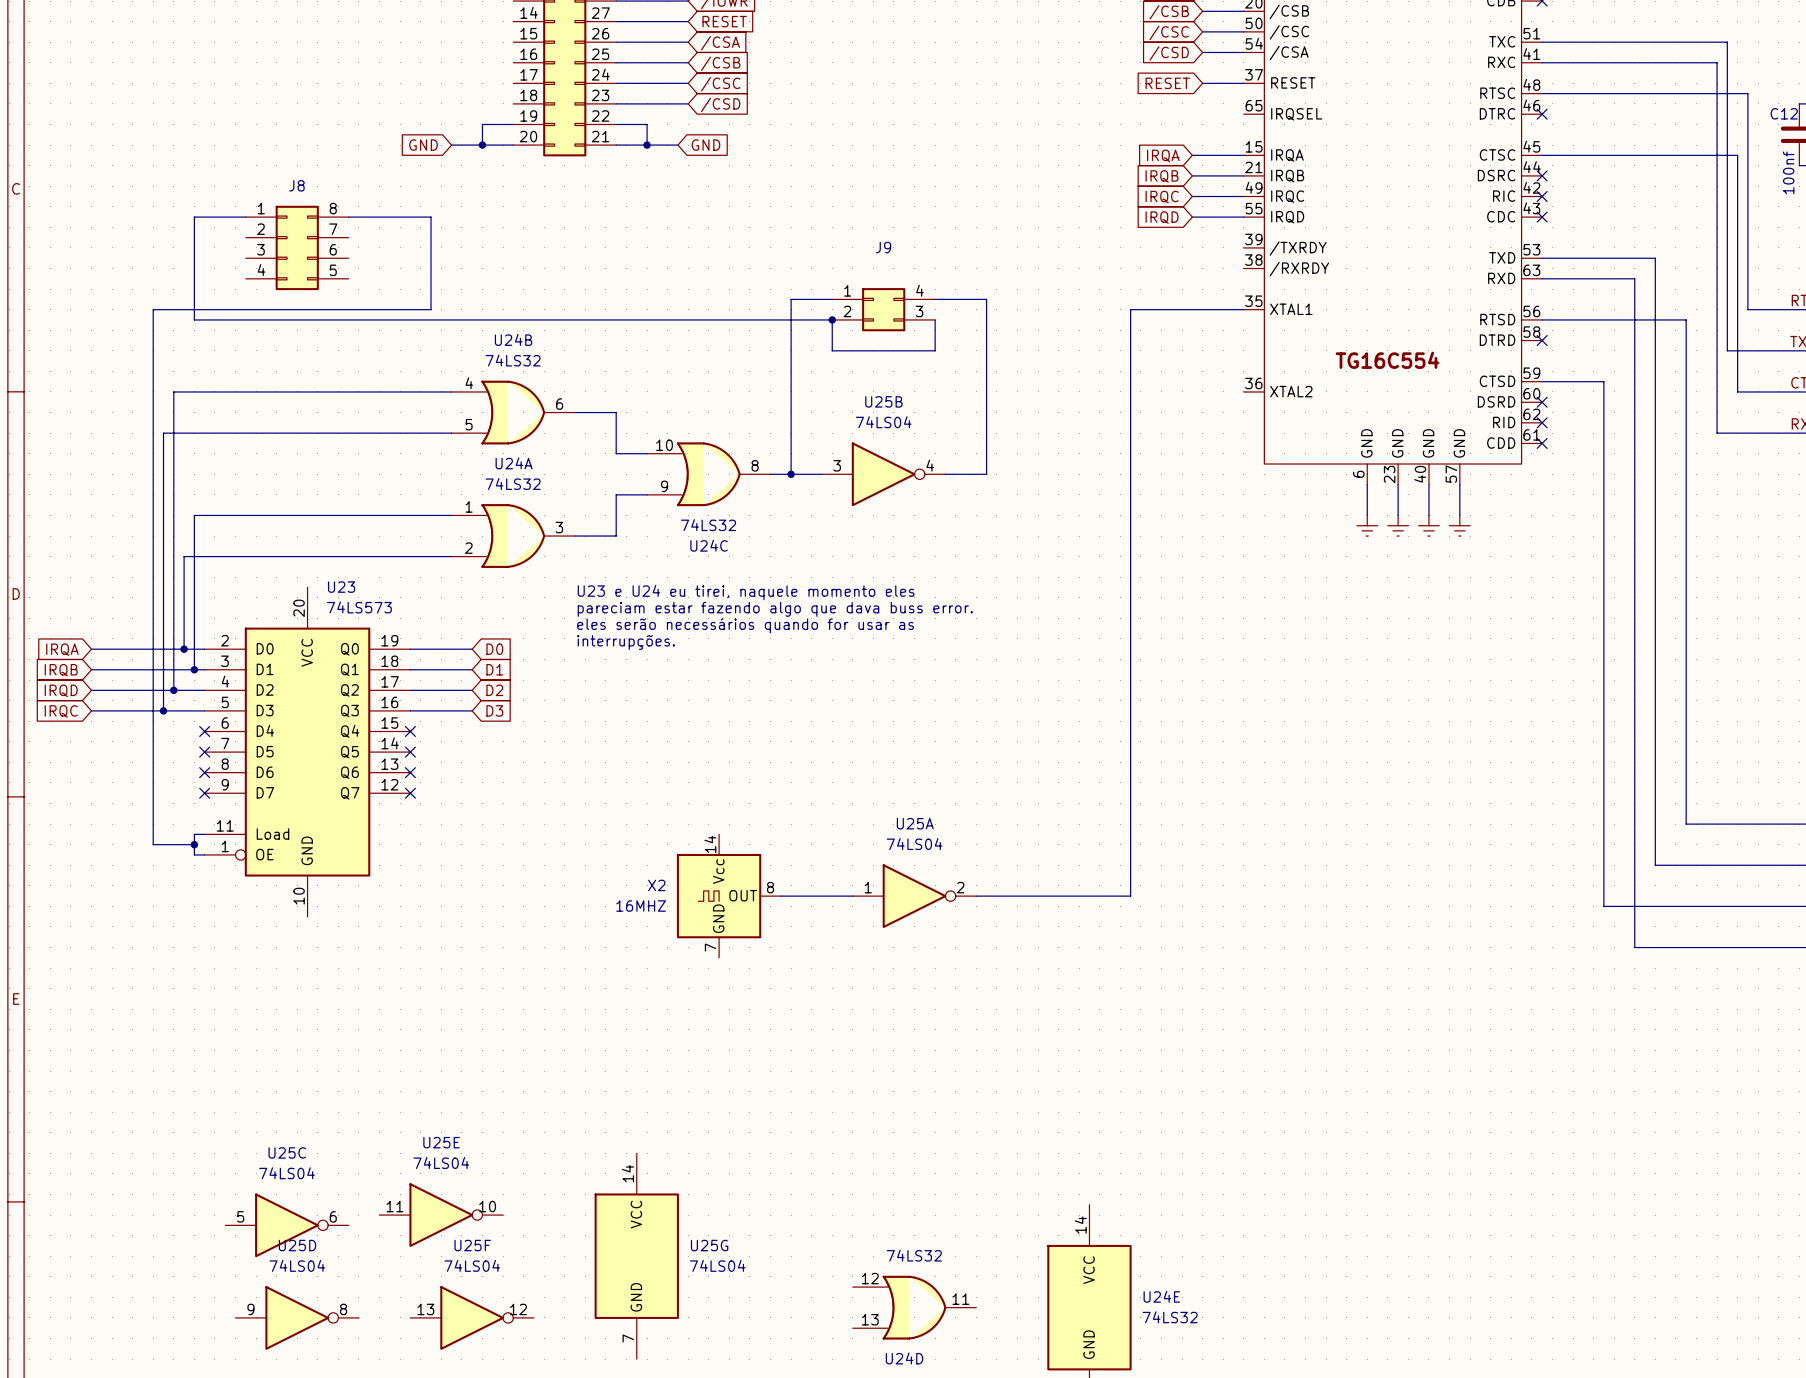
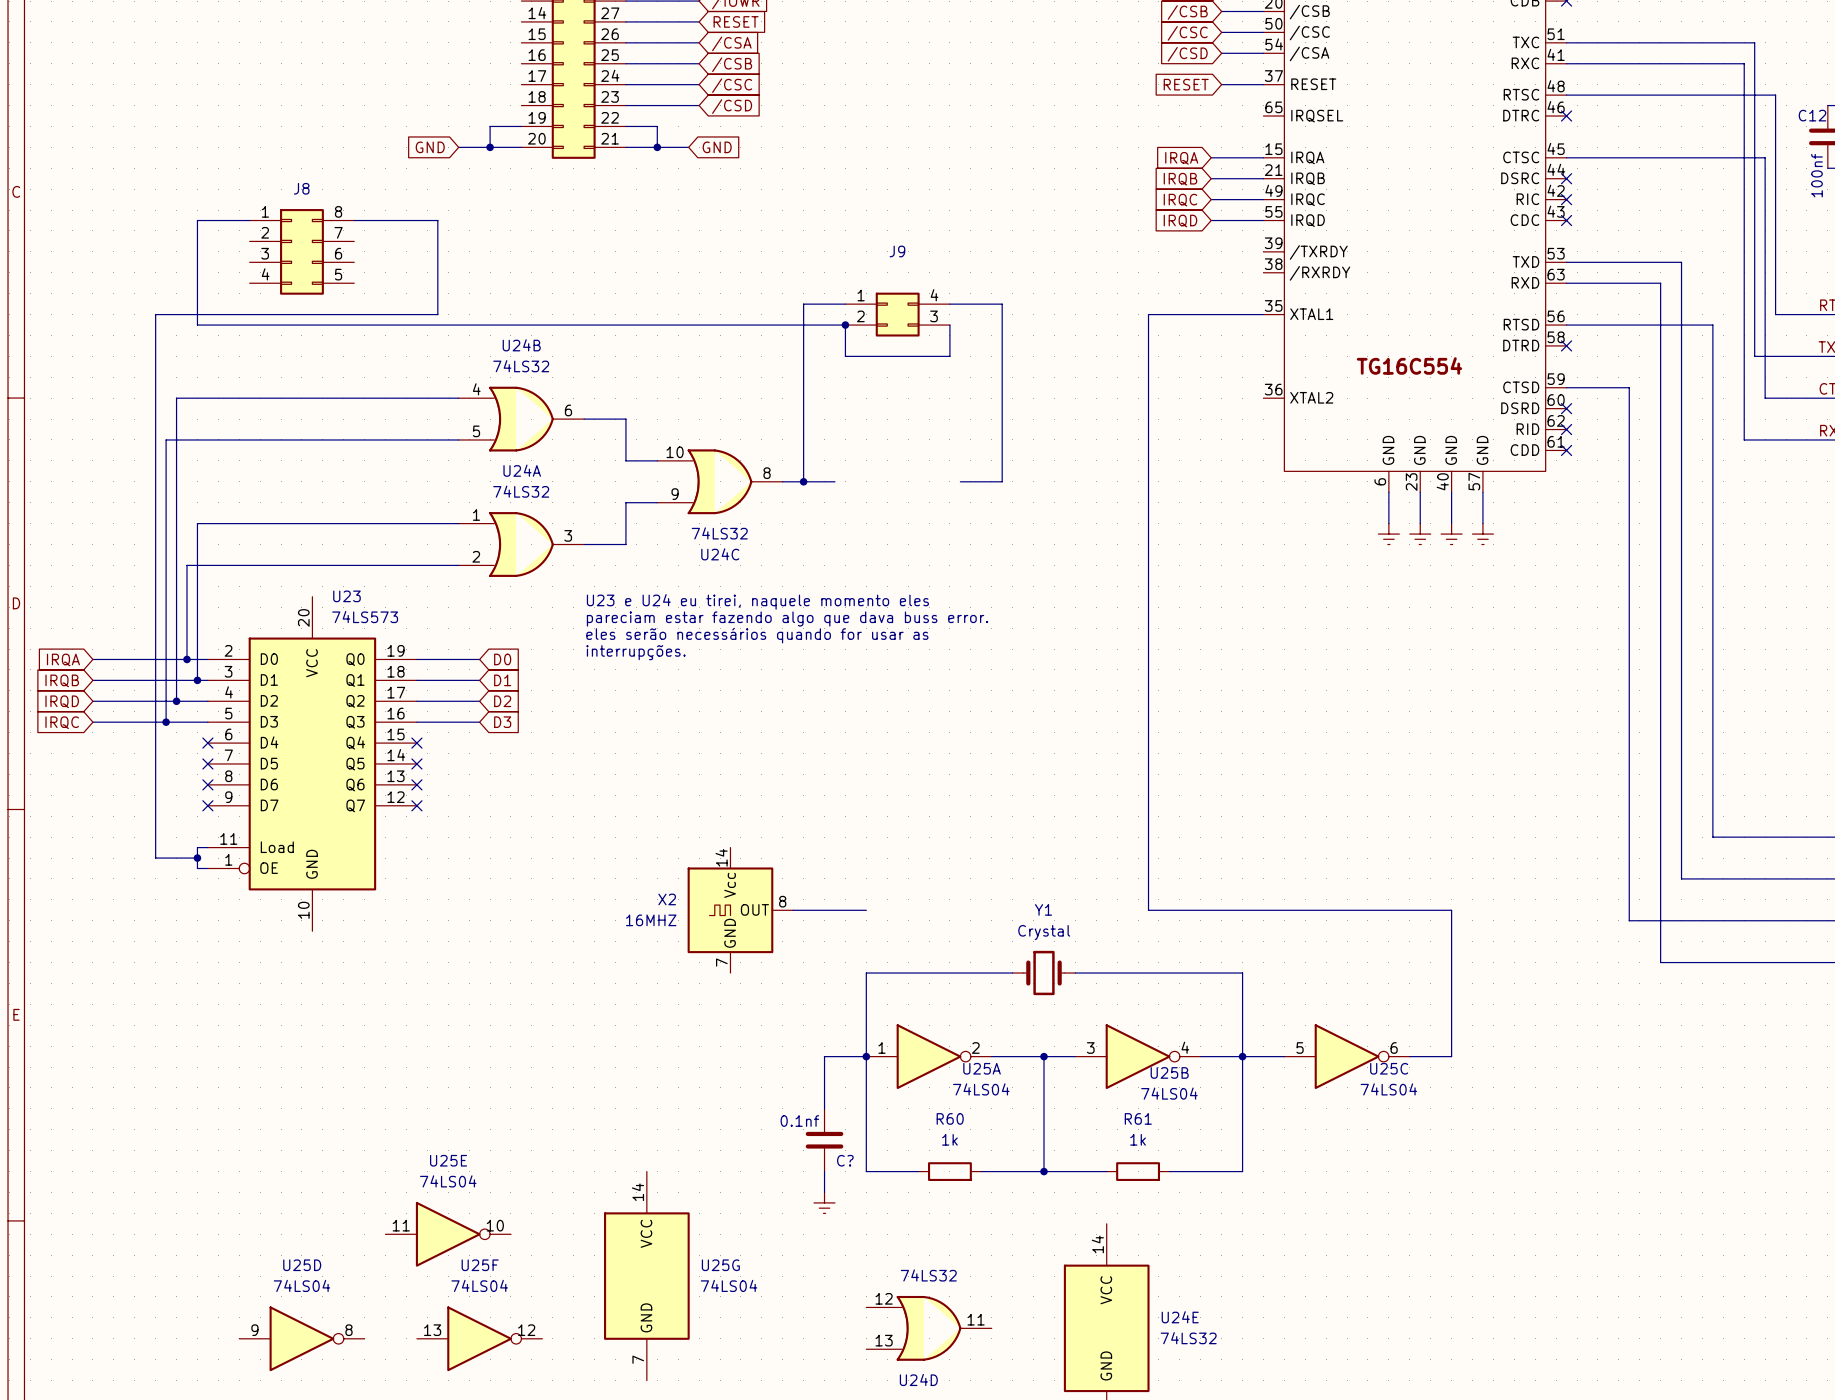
U25B name position: U25B (883, 401) -> U25B (1169, 1072)
U25B value position: 74LS04 (883, 422) -> 74LS04 (1169, 1093)
U25B position: (883, 474) -> (1138, 1056)
U25A name position: U25A (915, 823) -> U25A (982, 1068)
U25A value position: 74LS04 (914, 844) -> 74LS04 (981, 1089)
U25A position: (914, 896) -> (929, 1056)
wire: (976, 896) (1130, 896) -> (1409, 1056) (1451, 1056) (1451, 910) (1148, 910)
wire: none -> (1012, 973) (866, 973) (866, 1171) (918, 1171)
Y1: none -> Crystal (1044, 973)
wire: none -> (1075, 973) (1242, 973) (1242, 1171) (1169, 1171)
wire: none -> (866, 1056) (824, 1056) (824, 1108)
junction: none -> (866, 1056)
wire: none -> (991, 1056) (1075, 1056)
wire: none -> (1044, 1056) (1044, 1171)
junction: none -> (1044, 1056)
wire: none -> (1200, 1056) (1284, 1056)
junction: none -> (1242, 1056)
C?: none -> 0.1nf (824, 1140)
U25C name position: U25C (287, 1152) -> U25C (1389, 1068)
wire: none -> (824, 1171) (824, 1192)
R60: none -> 1k (949, 1171)
wire: none -> (981, 1171) (1106, 1171)
junction: none -> (1044, 1171)
R61: none -> 1k (1138, 1171)
U25C value position: 74LS04 (286, 1173) -> 74LS04 (1388, 1089)
power symbol: none -> (824, 1202)
U25C position: (286, 1225) -> (1347, 1056)

